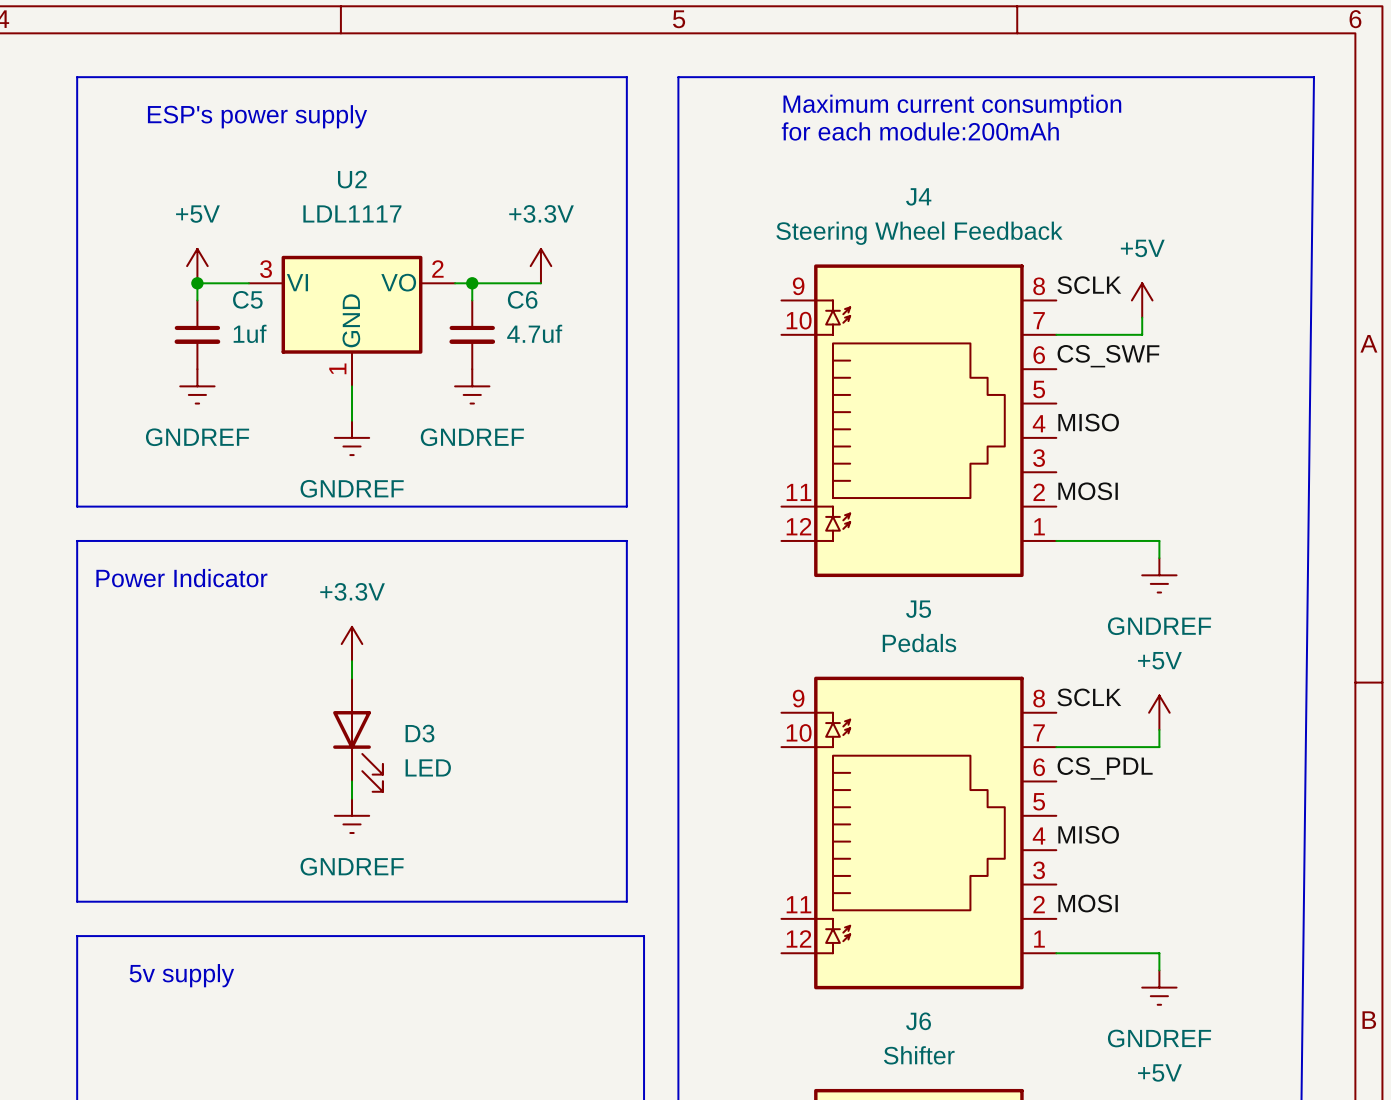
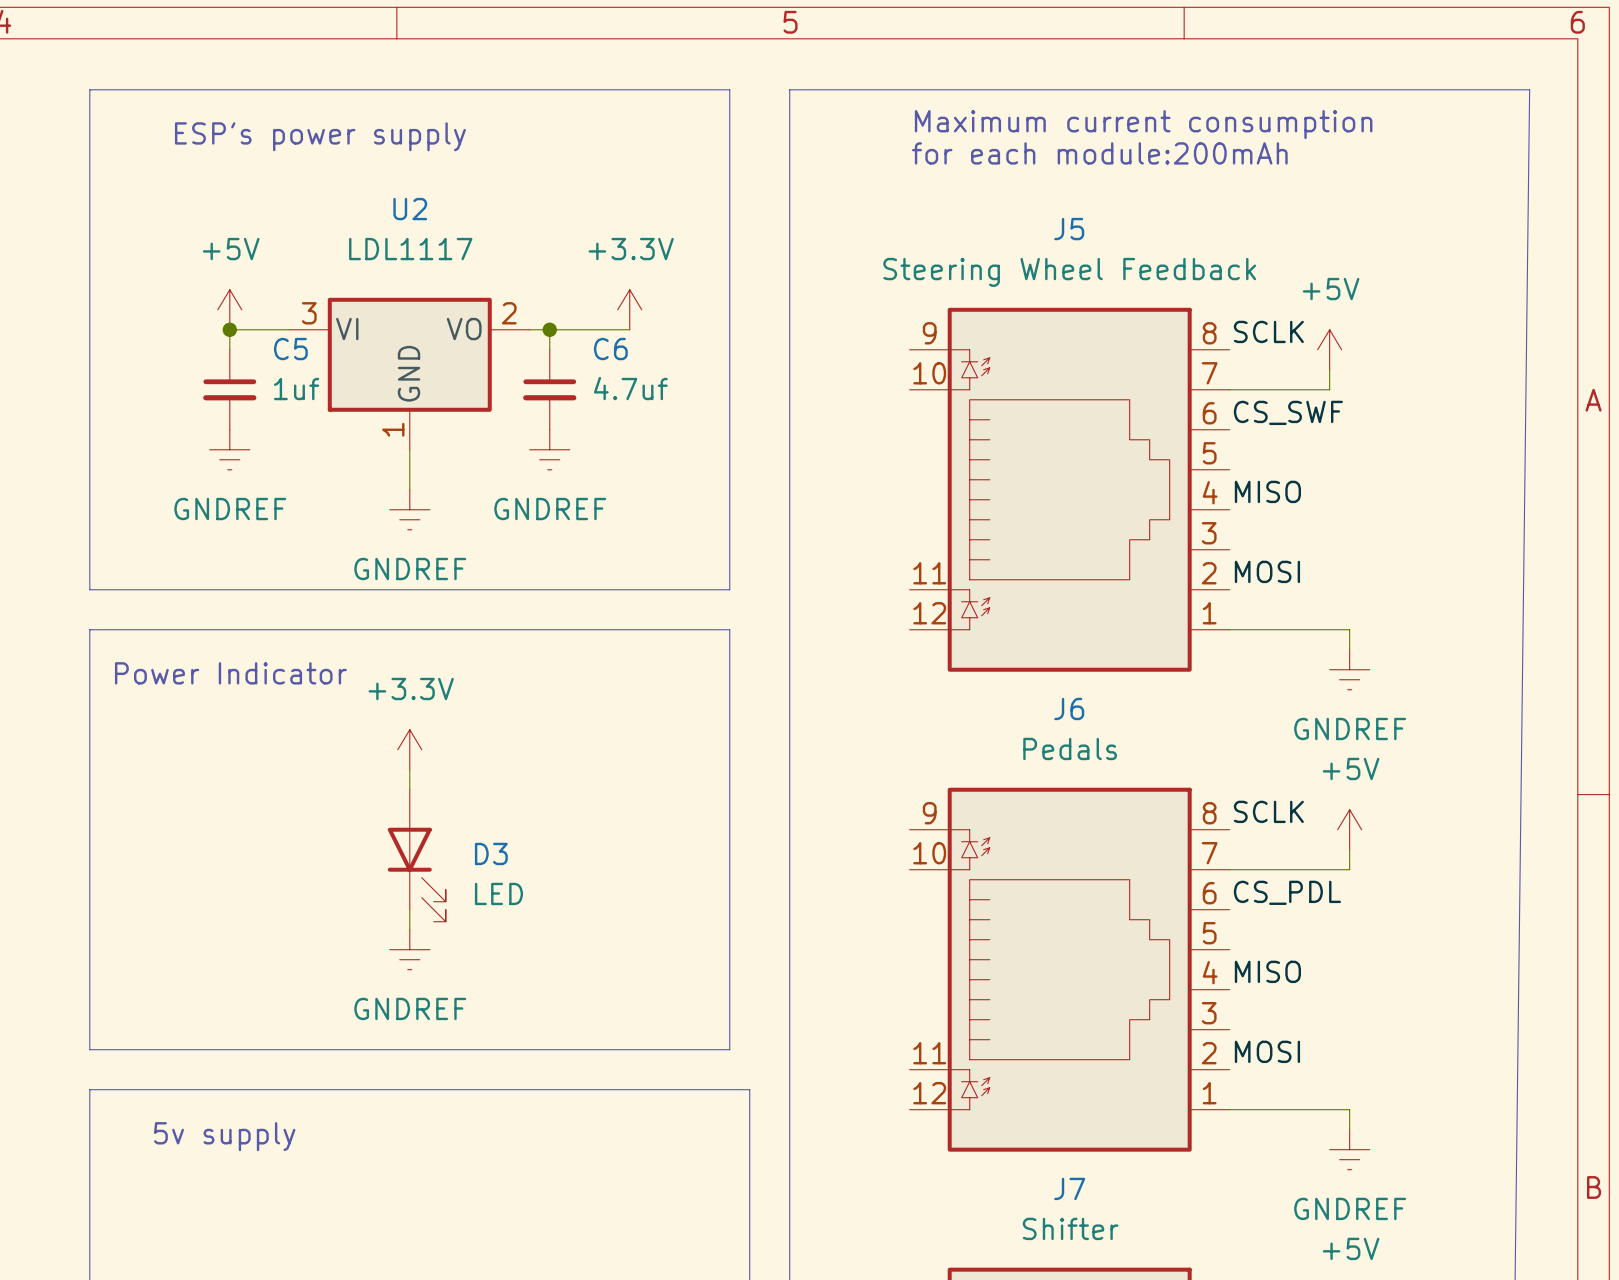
J4 name: J4 (918, 196) -> J5 (1069, 229)
J5 name: J5 (918, 609) -> J6 (1069, 708)
J6 name: J6 (918, 1021) -> J7 (1069, 1188)

